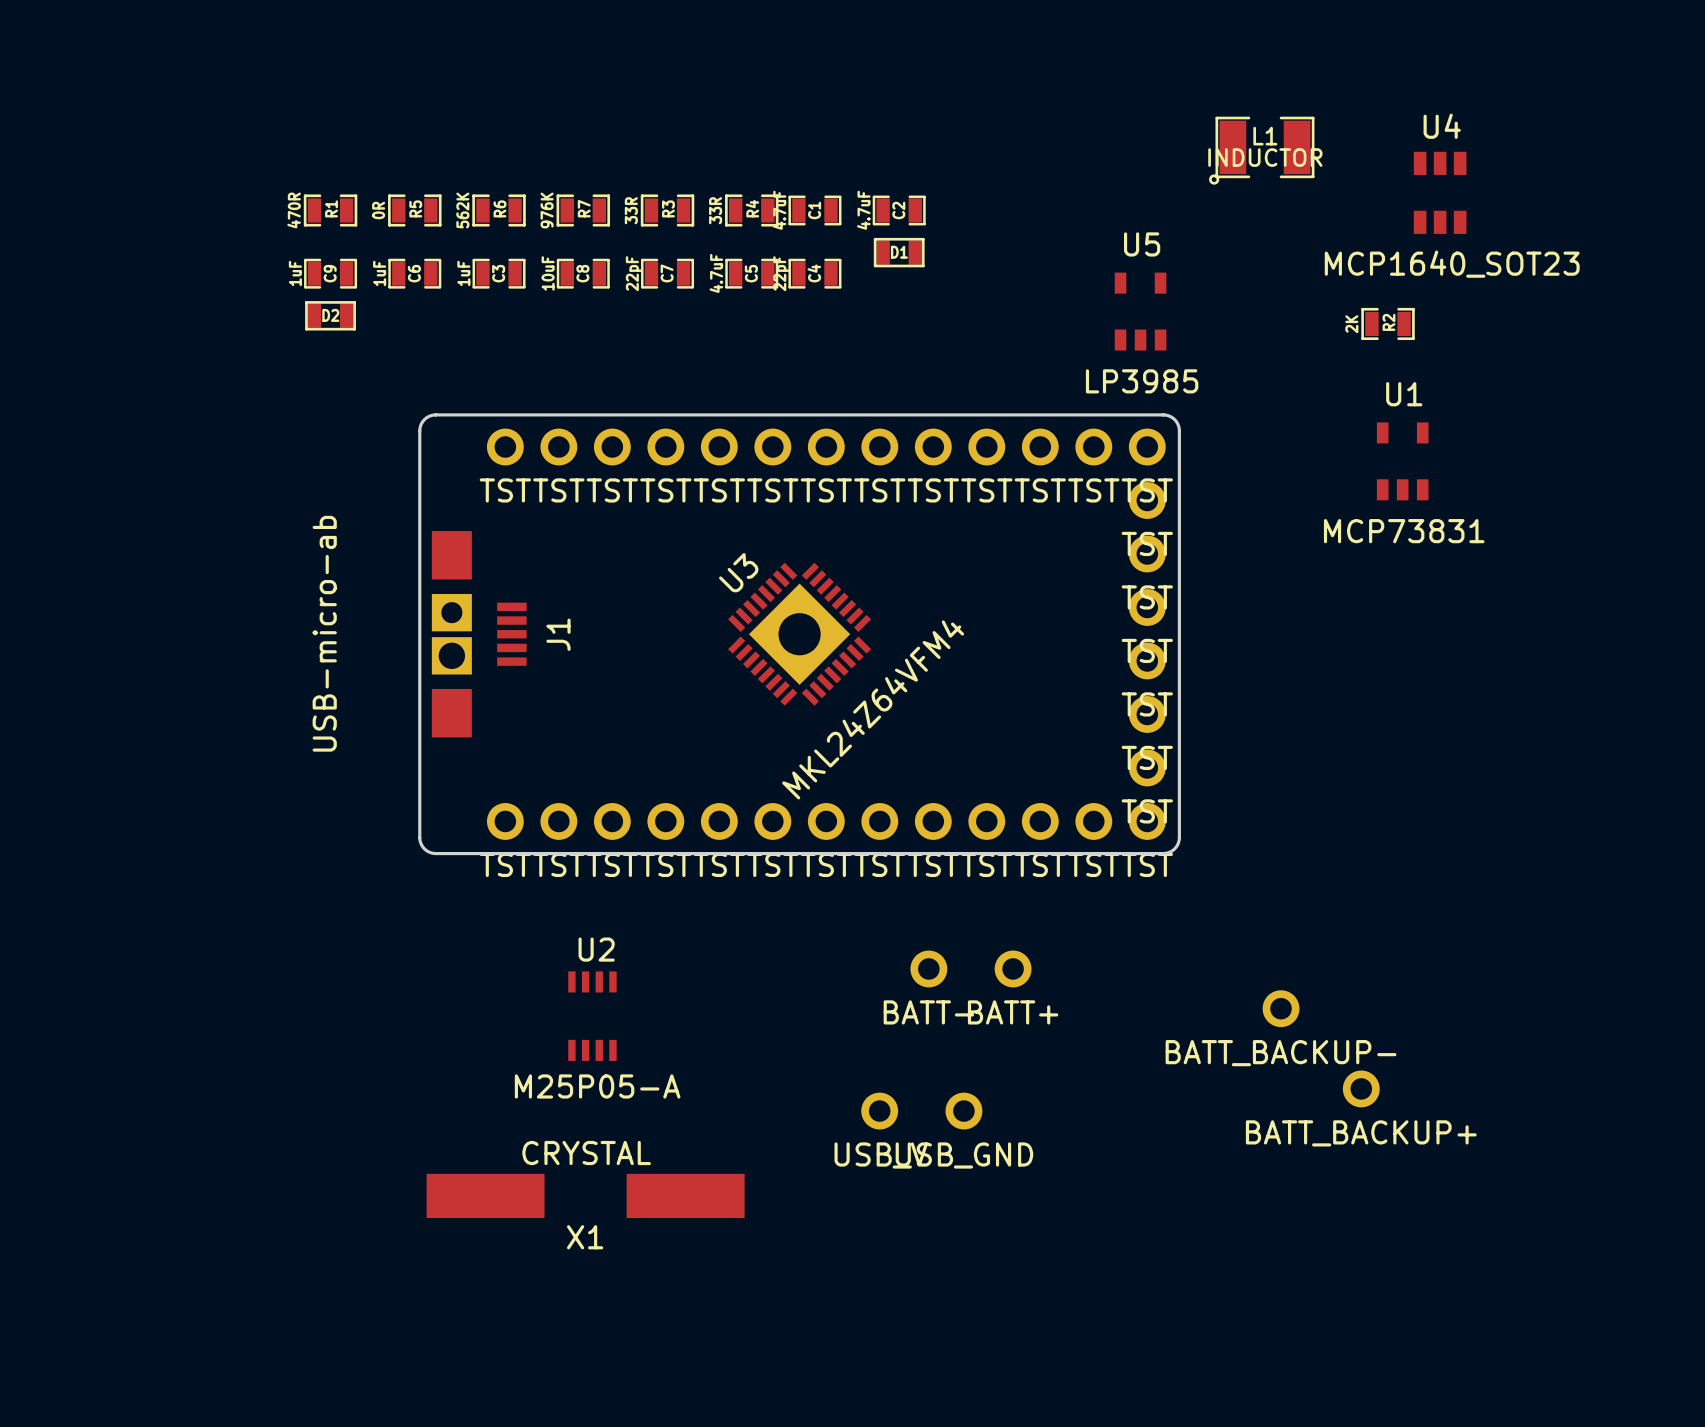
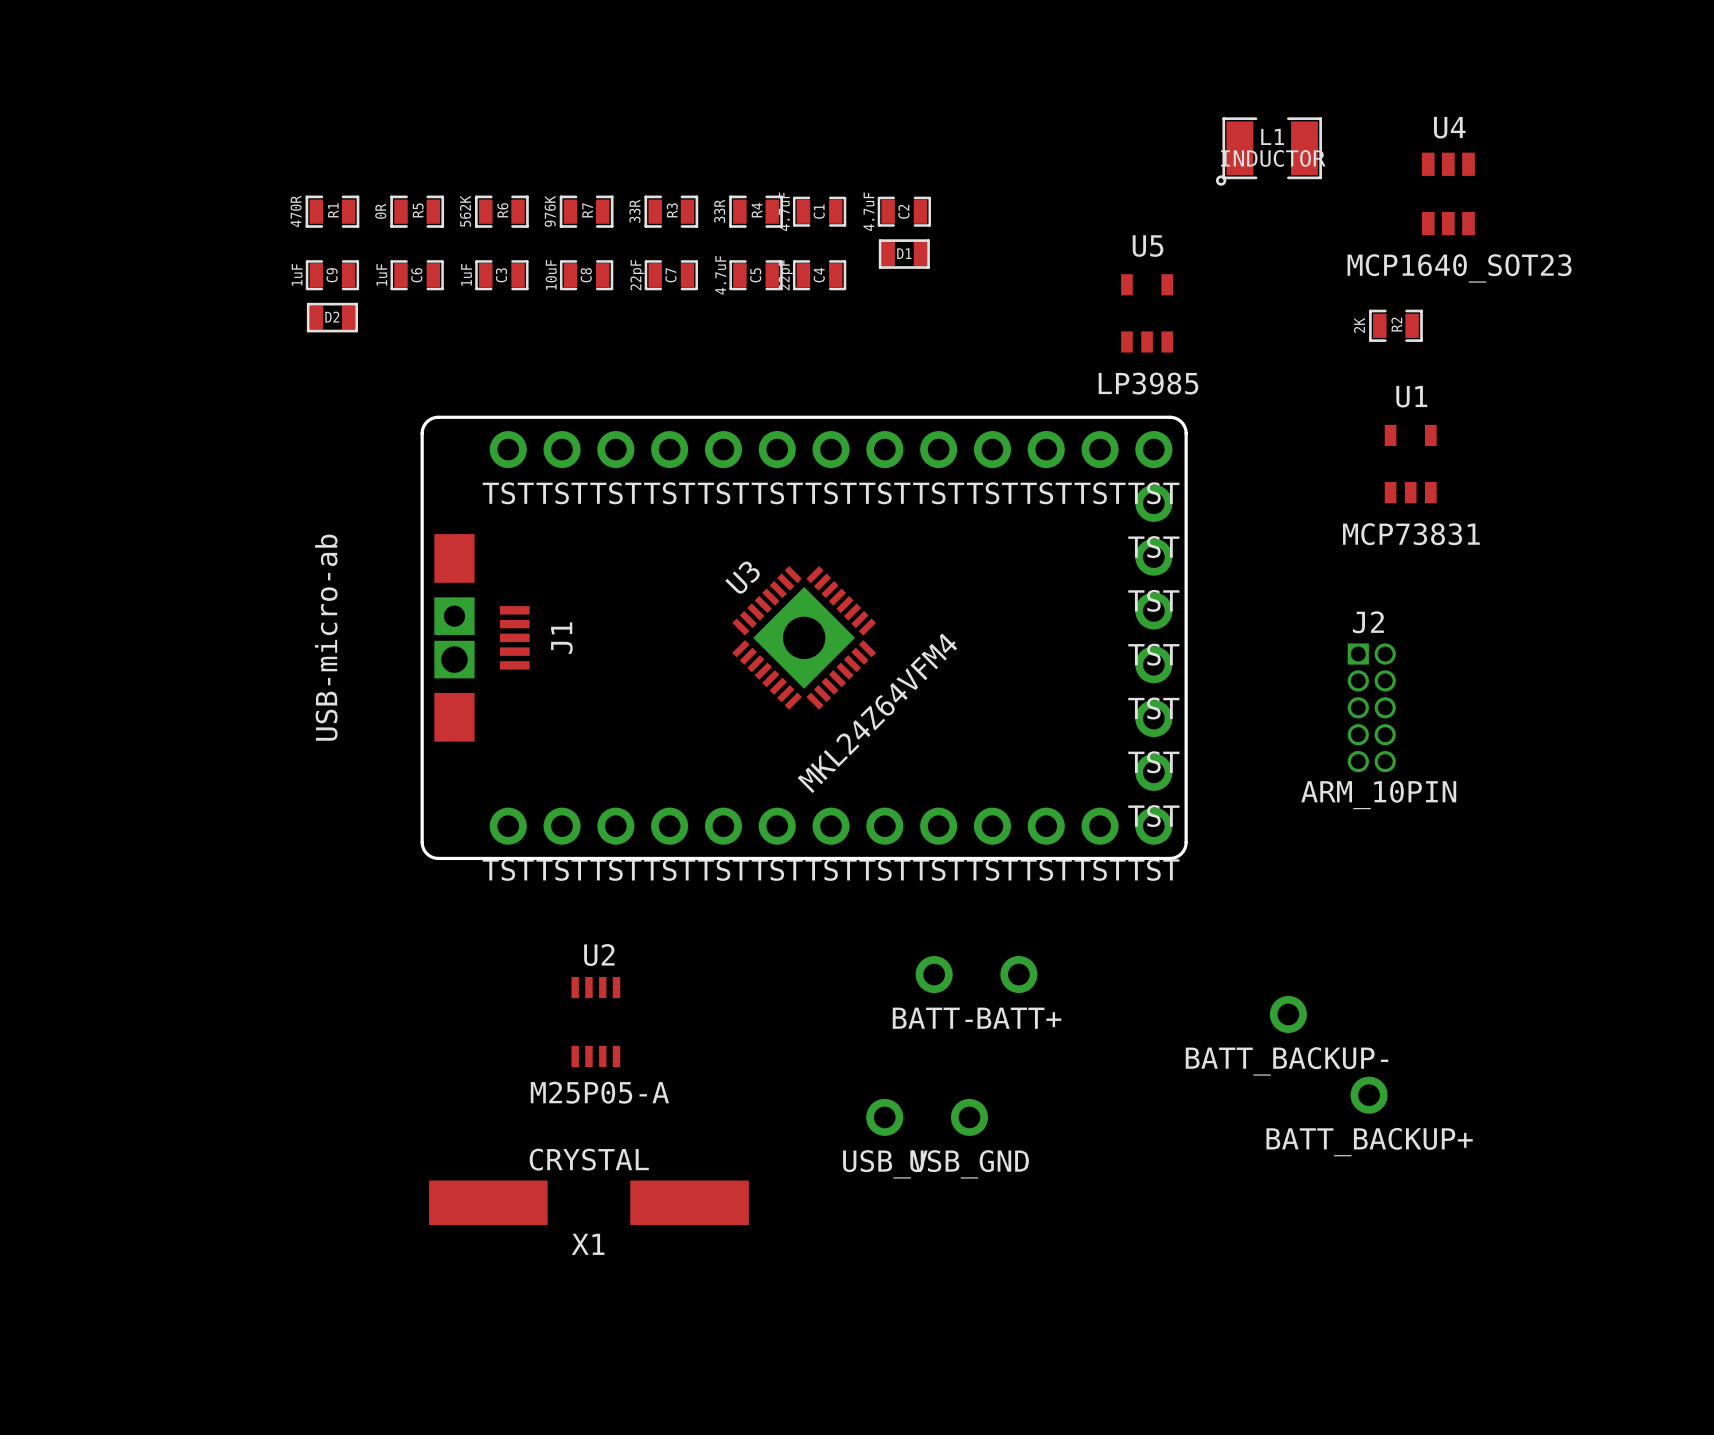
J2: none -> ARM_10PIN (1371, 707)

